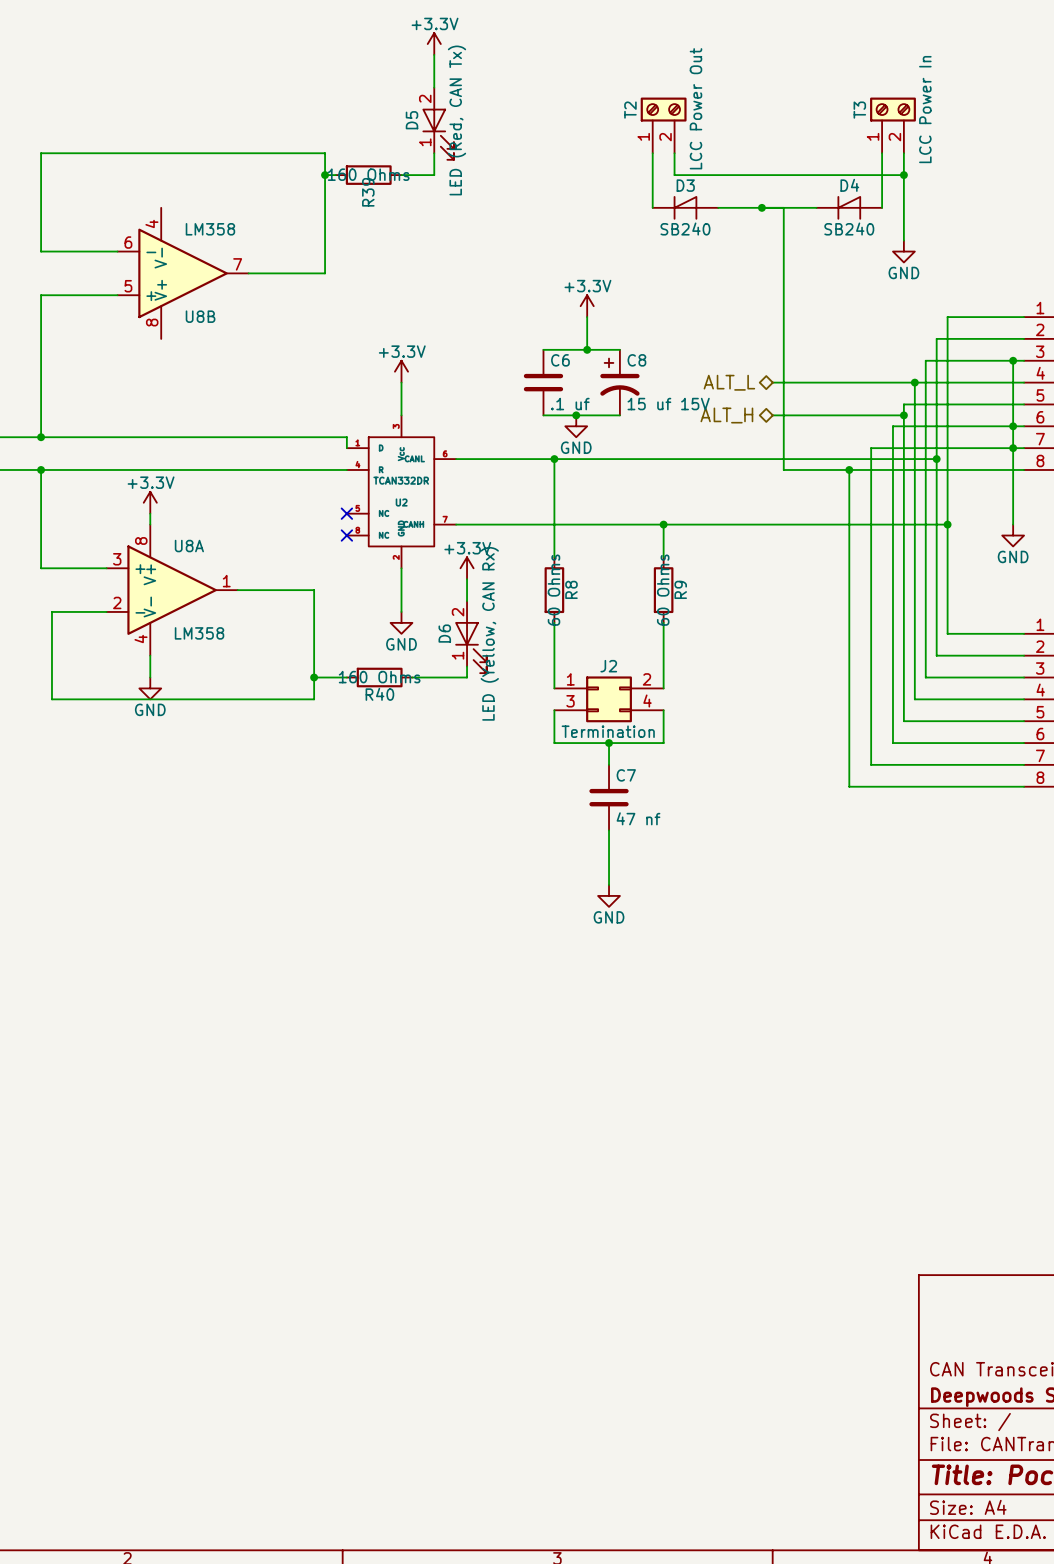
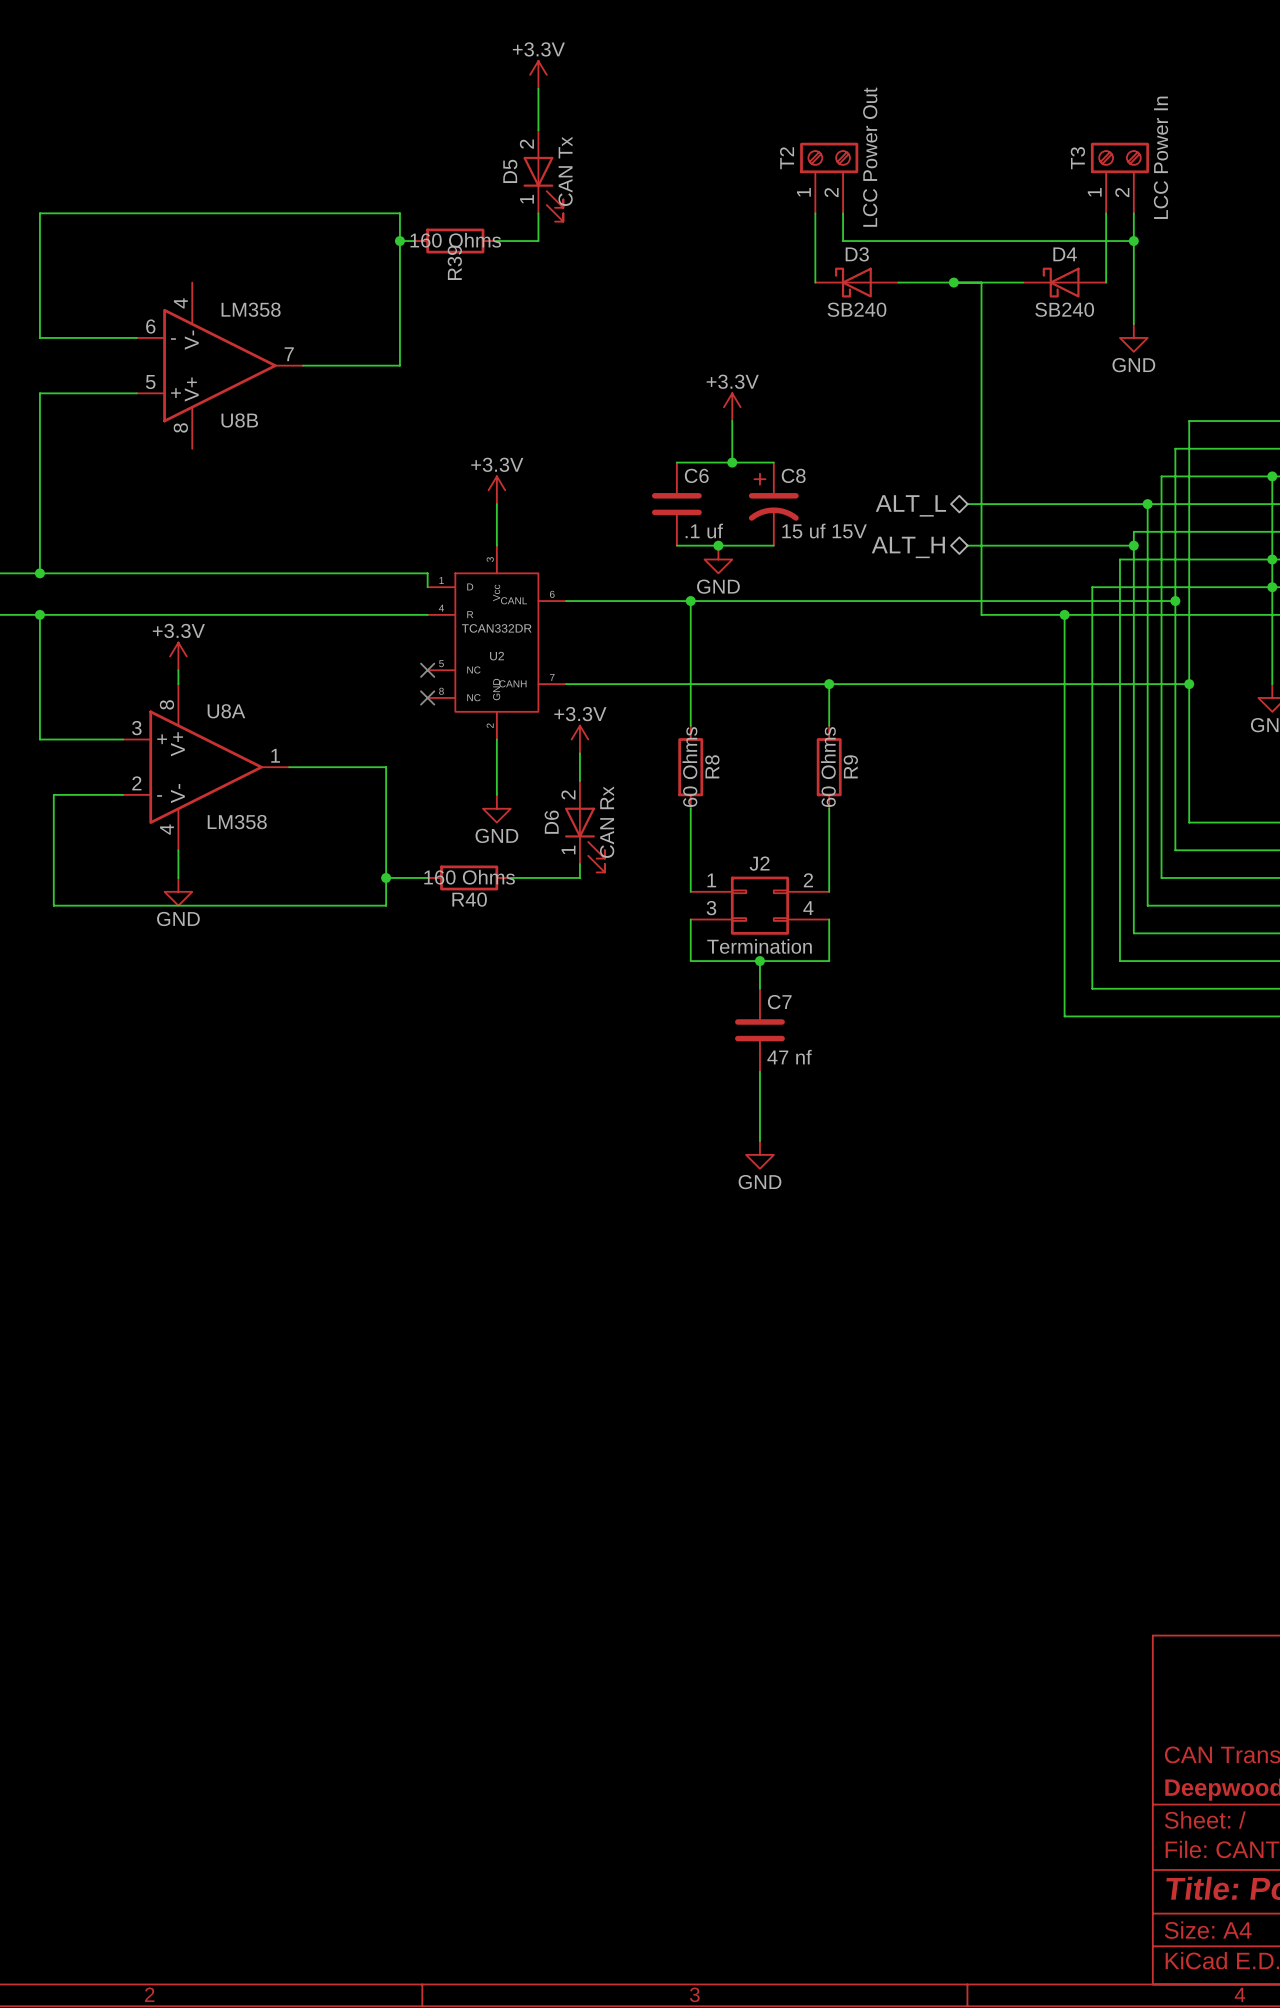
D5 value: LED (Red, CAN Tx) (457, 120) -> CAN Tx (565, 171)
D3 symbol: [652, 196, 719, 220] -> [815, 267, 899, 298]
D4 symbol: [816, 196, 883, 220] -> [1023, 267, 1107, 298]
D6 value: LED (Yellow, CAN Rx) (489, 633) -> CAN Rx (607, 822)

